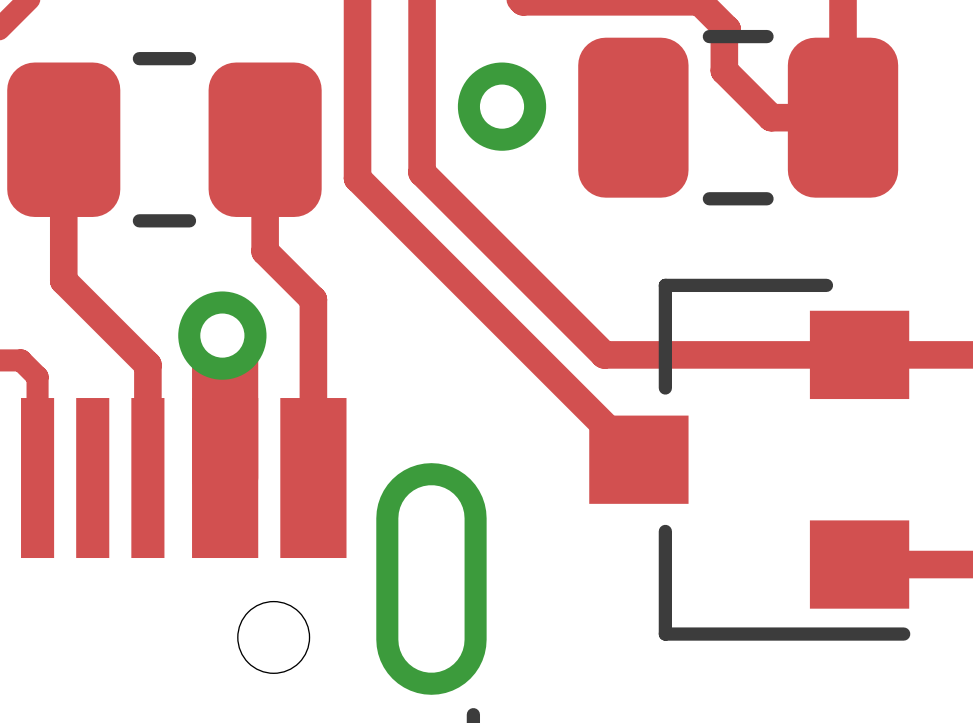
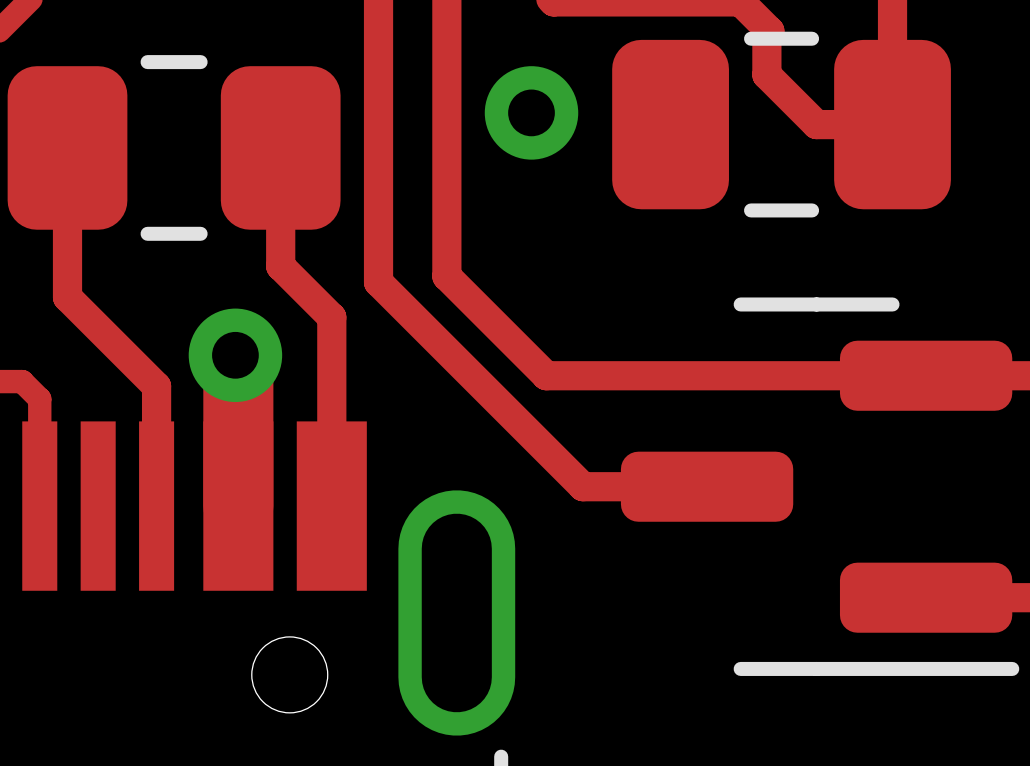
track: (422, 172) (604, 354) -> (446, 182) (446, 276) (546, 375) (639, 375)
track: (357, 178) (638, 459) -> (378, 188) (378, 282) (582, 486) (676, 486)
part footprint: [589, 278, 911, 641] -> [620, 297, 1020, 676]

